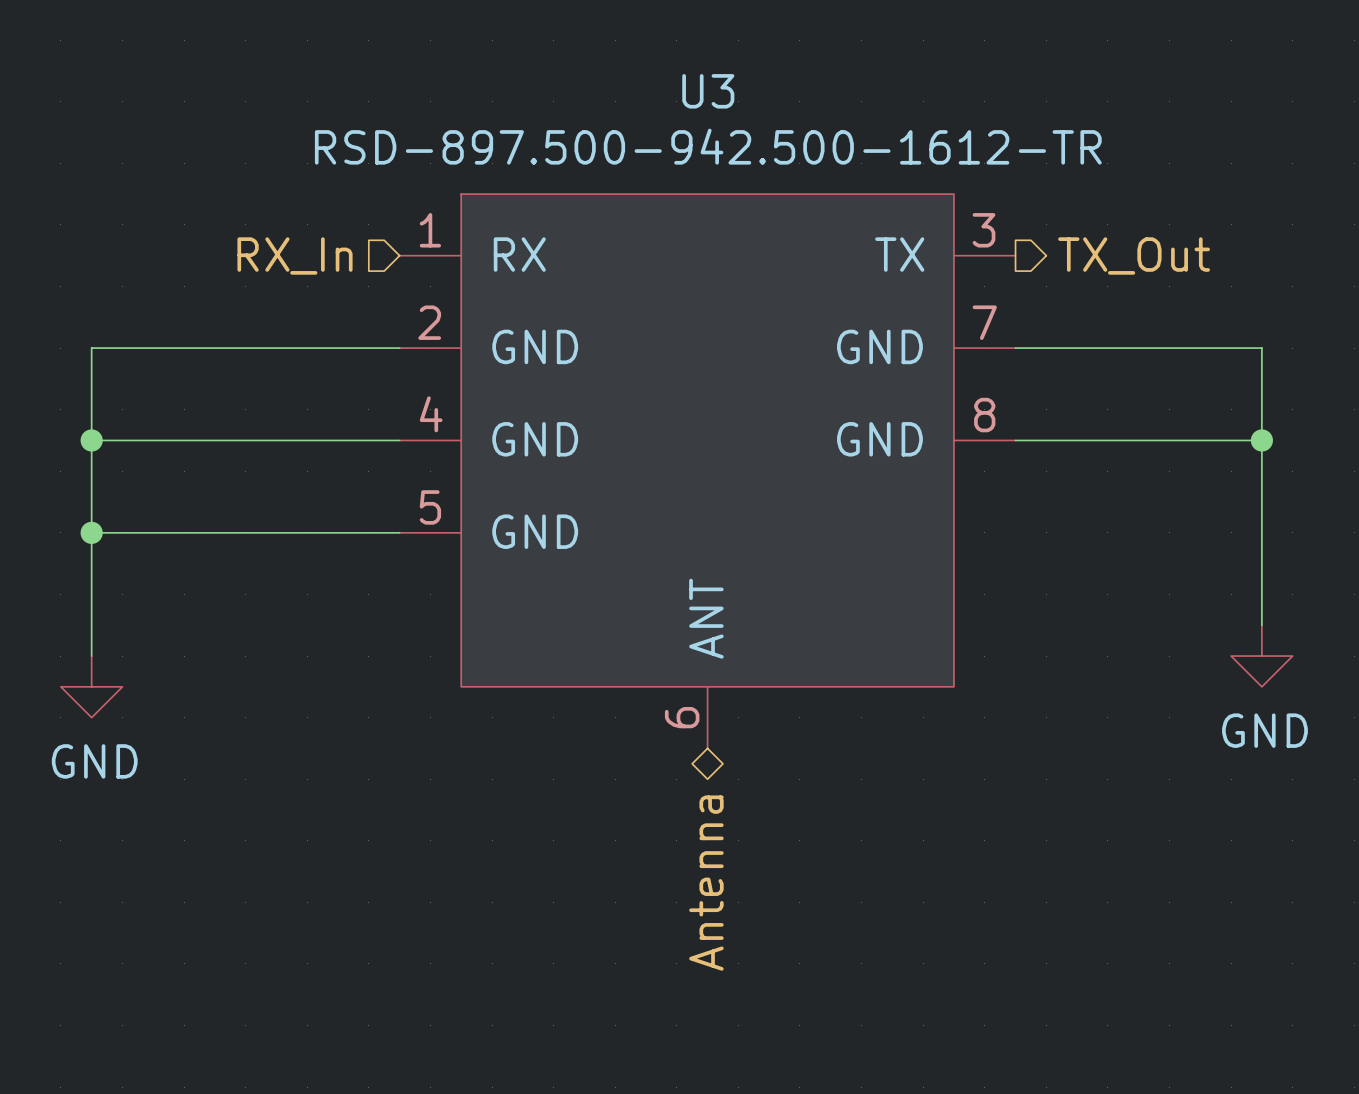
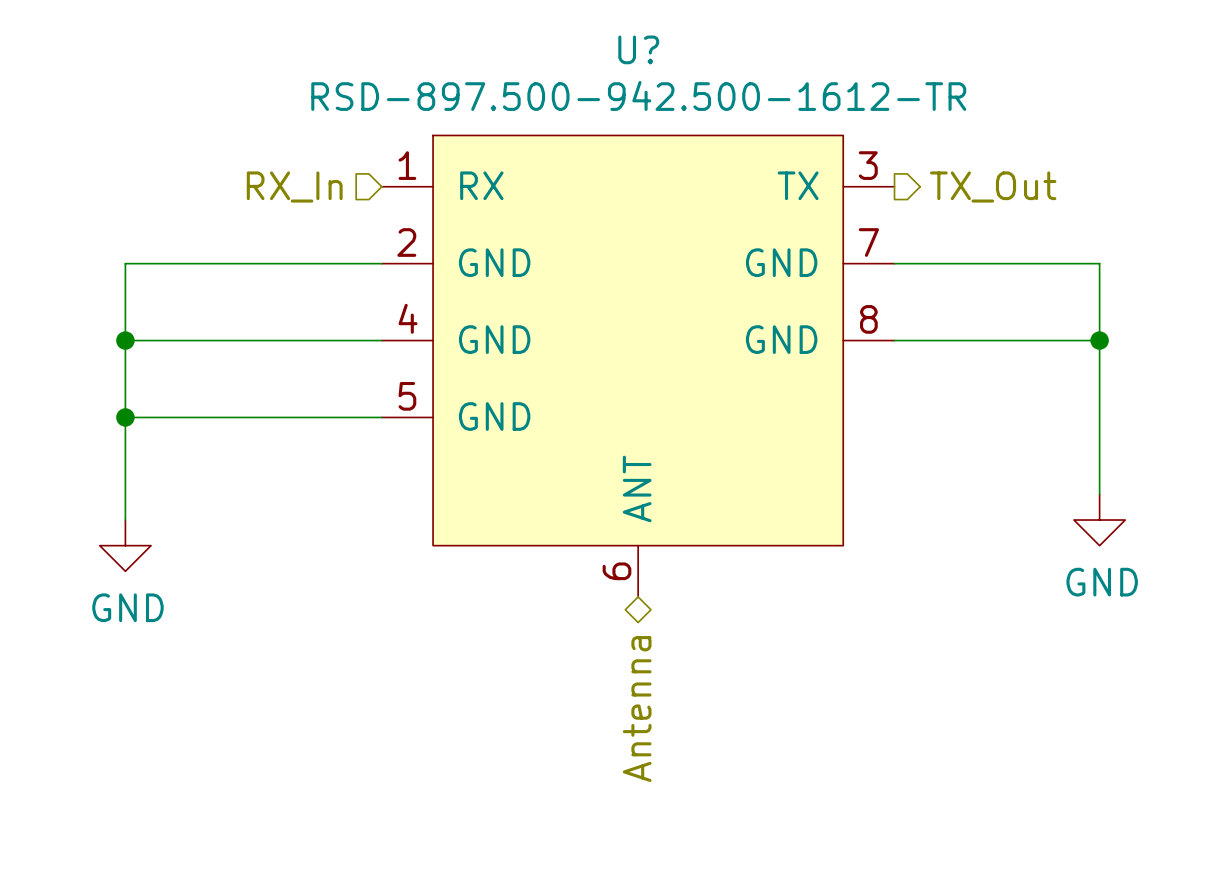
U3 name: U3 (708, 91) -> U? (638, 49)

